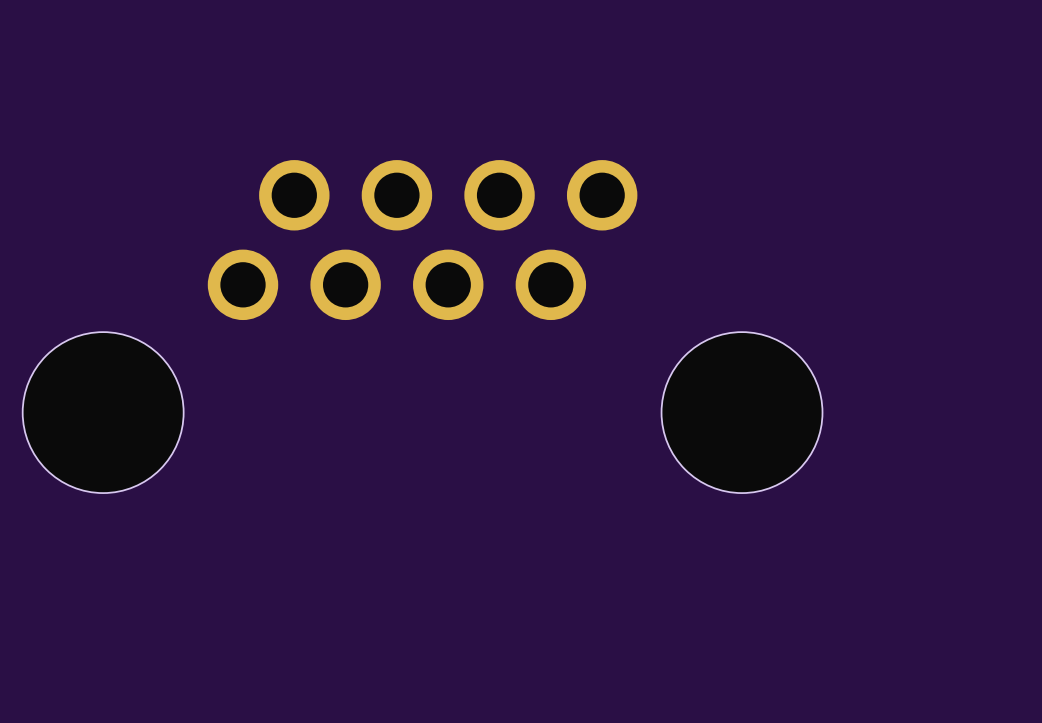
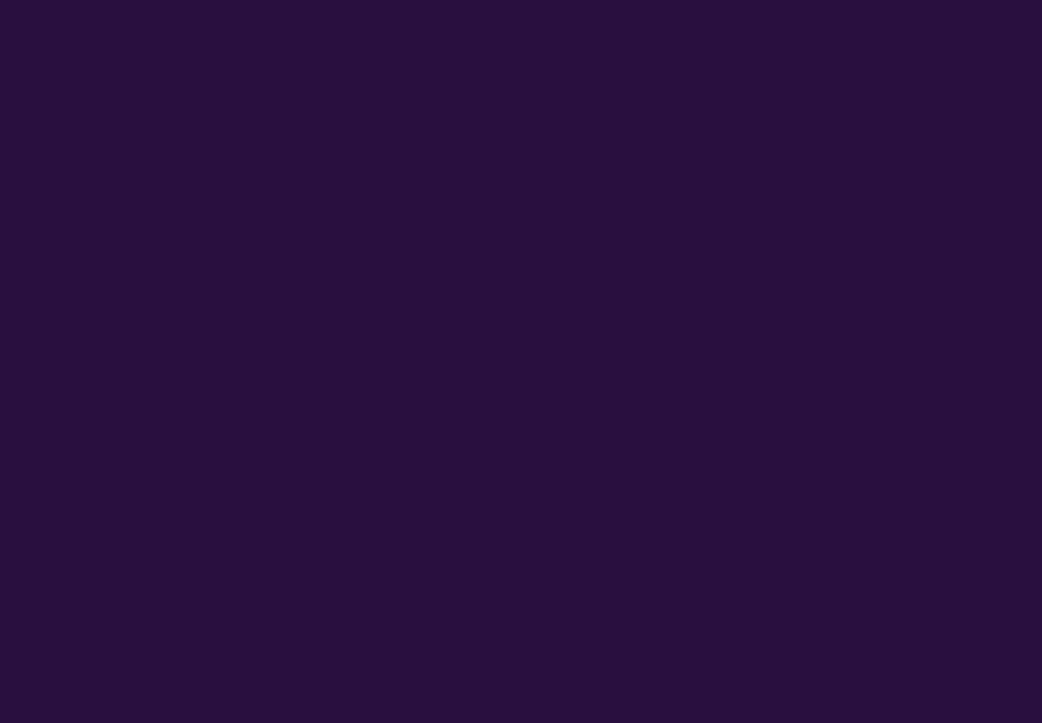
part: (422, 326) -> none

